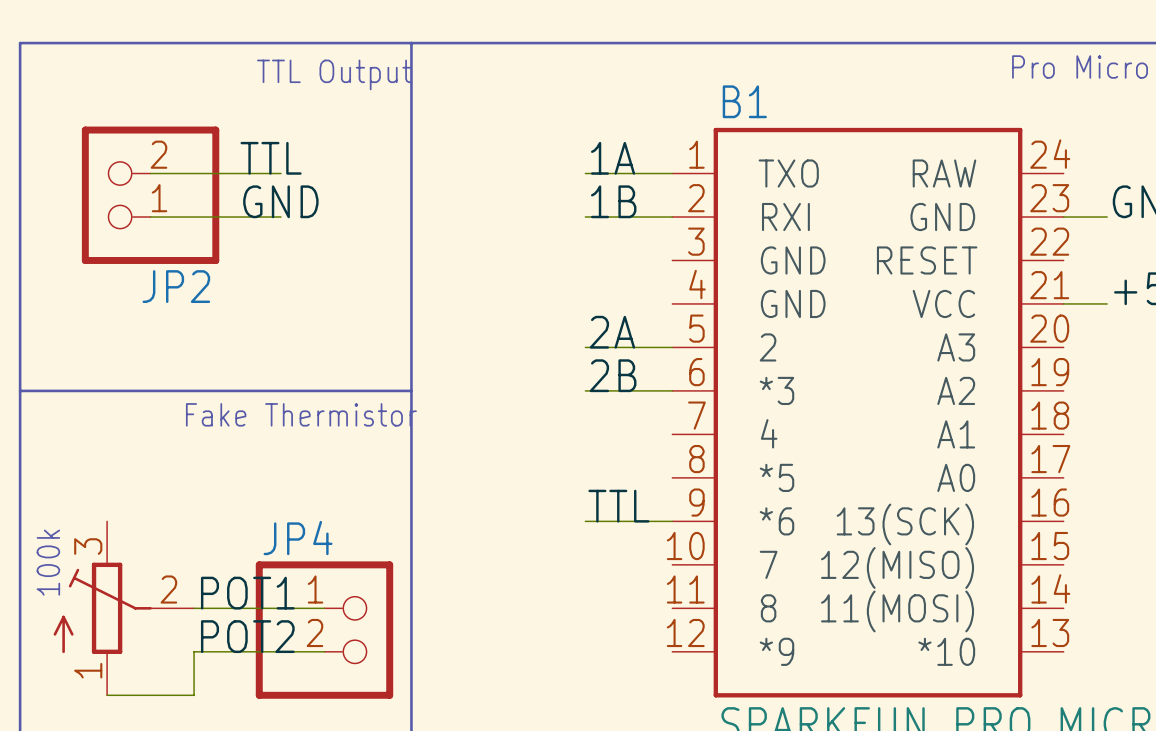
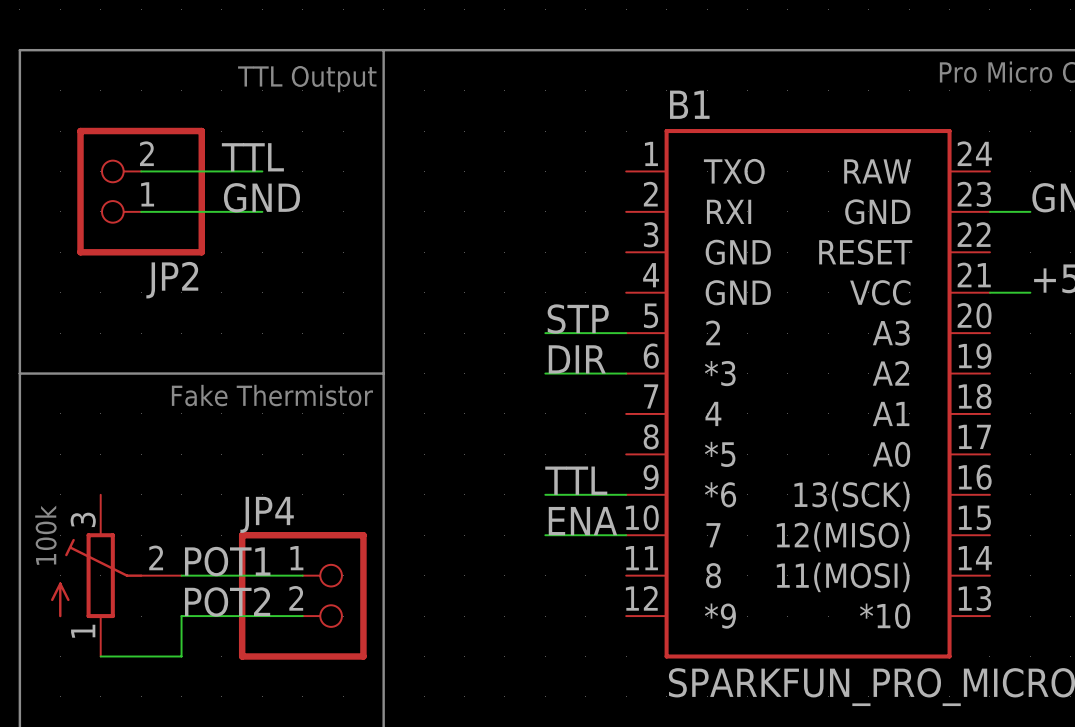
label: 1A (613, 158) -> none
wire: (585, 173) (672, 173) -> none
label: 1B (613, 201) -> none
wire: (585, 217) (672, 217) -> (545, 535) (626, 535)
label: 2A (612, 332) -> STP (578, 319)
label: 2B (613, 375) -> DIR (577, 359)
label: none -> ENA (582, 521)

